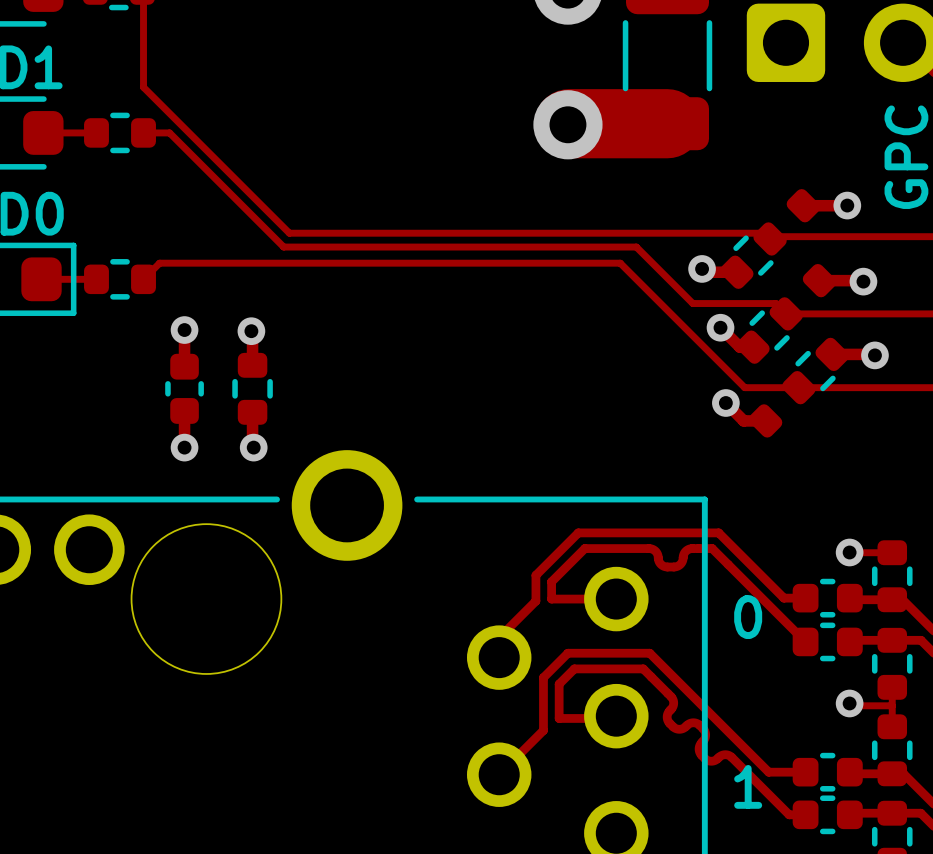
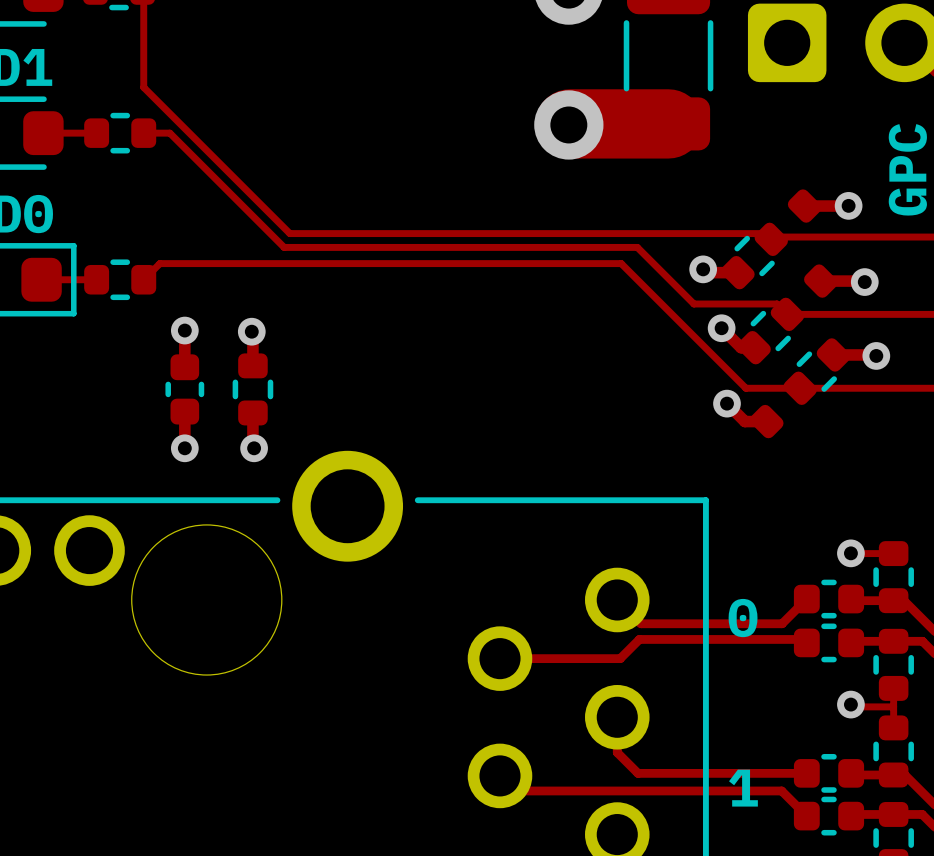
track: (805, 598) (783, 598) (718, 532) (578, 532) (535, 575) (535, 601) (499, 637) (499, 657) -> (803, 639) (639, 639) (620, 658) (499, 658)
track: (616, 599) (551, 599) (551, 581) (584, 548) (651, 548) (657, 553) (660, 564) (667, 567) (679, 565) (684, 553) (688, 549) (712, 548) (802, 638) -> (617, 599) (641, 623) (782, 623) (806, 599)
track: (616, 716) (614, 718) (559, 718) (559, 684) (574, 668) (643, 668) (673, 699) (673, 706) (667, 715) (669, 723) (679, 729) (694, 722) (703, 729) (705, 737) (699, 749) (704, 758) (712, 761) (723, 755) (729, 755) (789, 814) (805, 814) -> (617, 717) (617, 752) (638, 773) (769, 773)
track: (768, 772) (649, 653) (567, 653) (543, 677) (543, 730) (499, 774) -> (806, 816) (781, 790) (515, 790) (499, 775)

